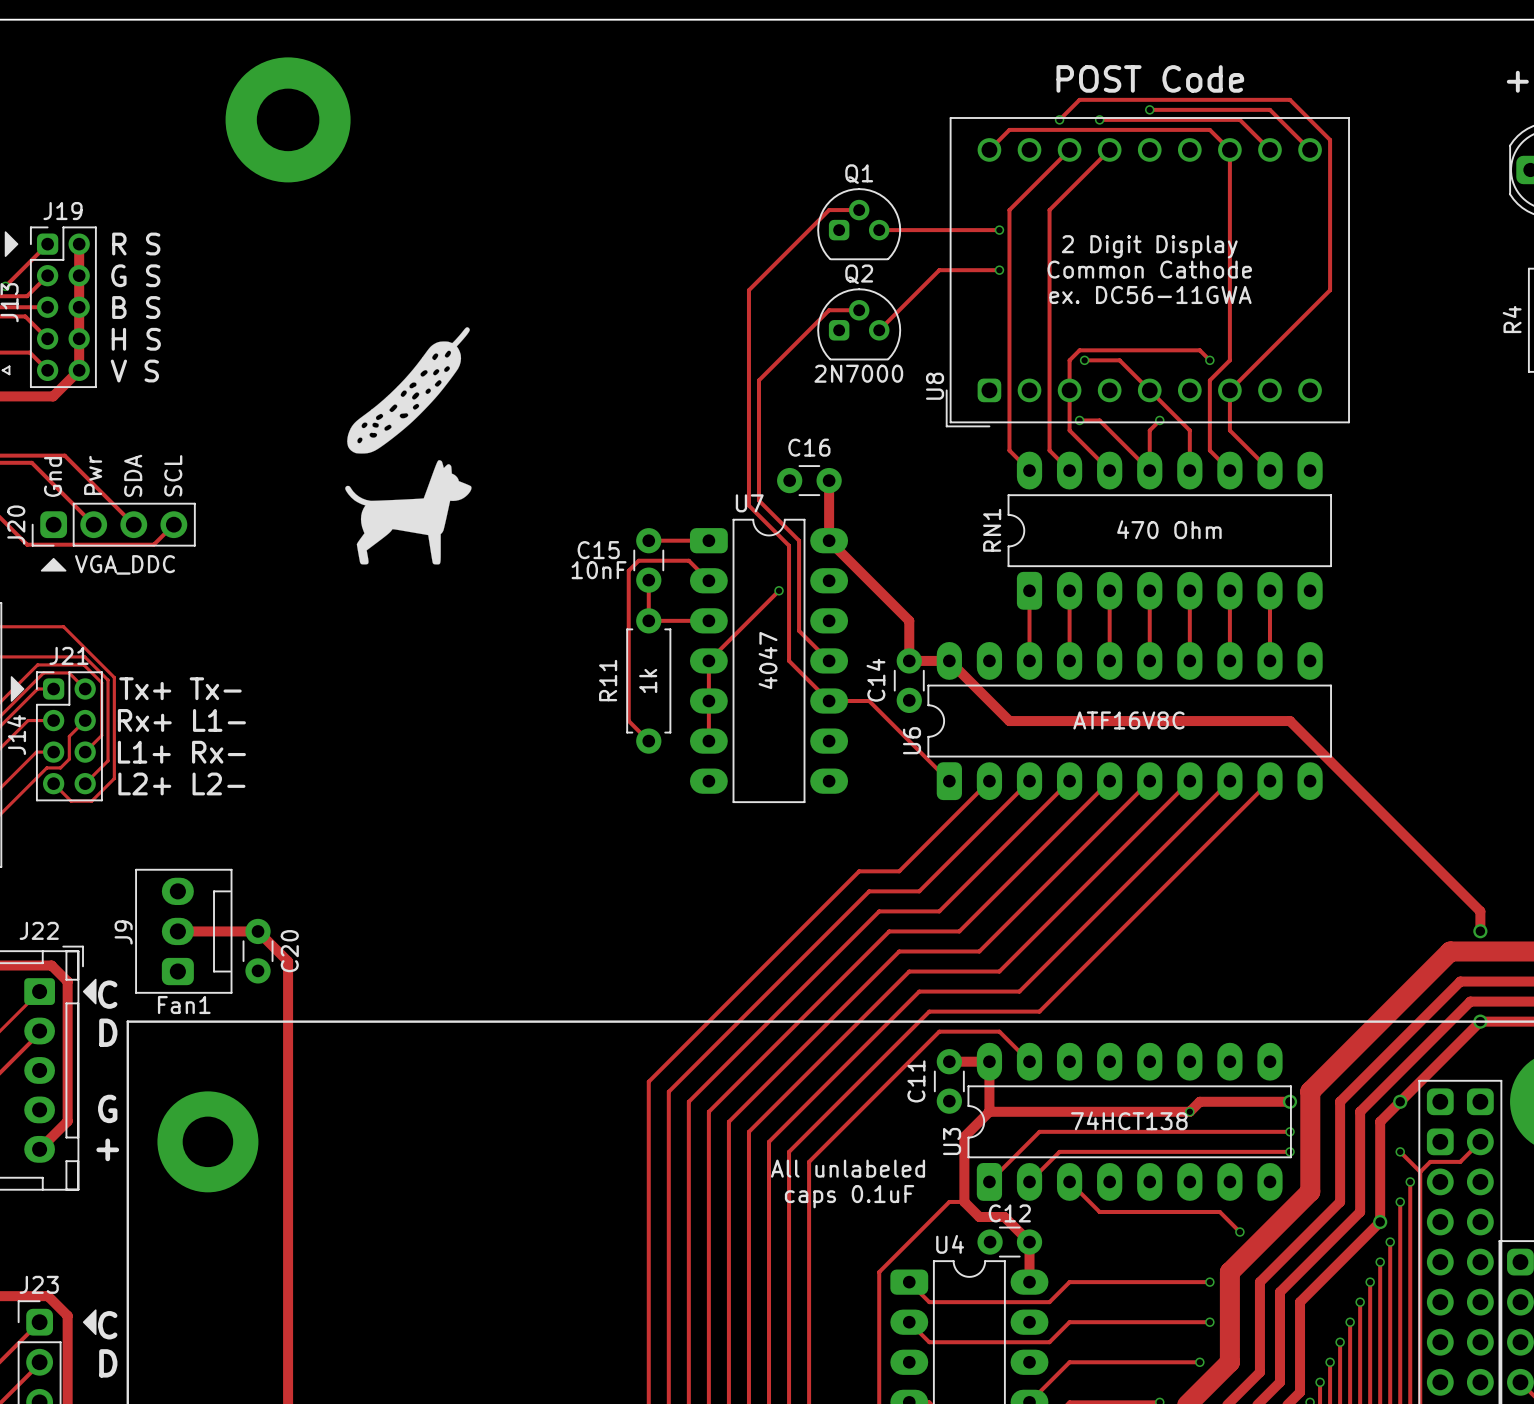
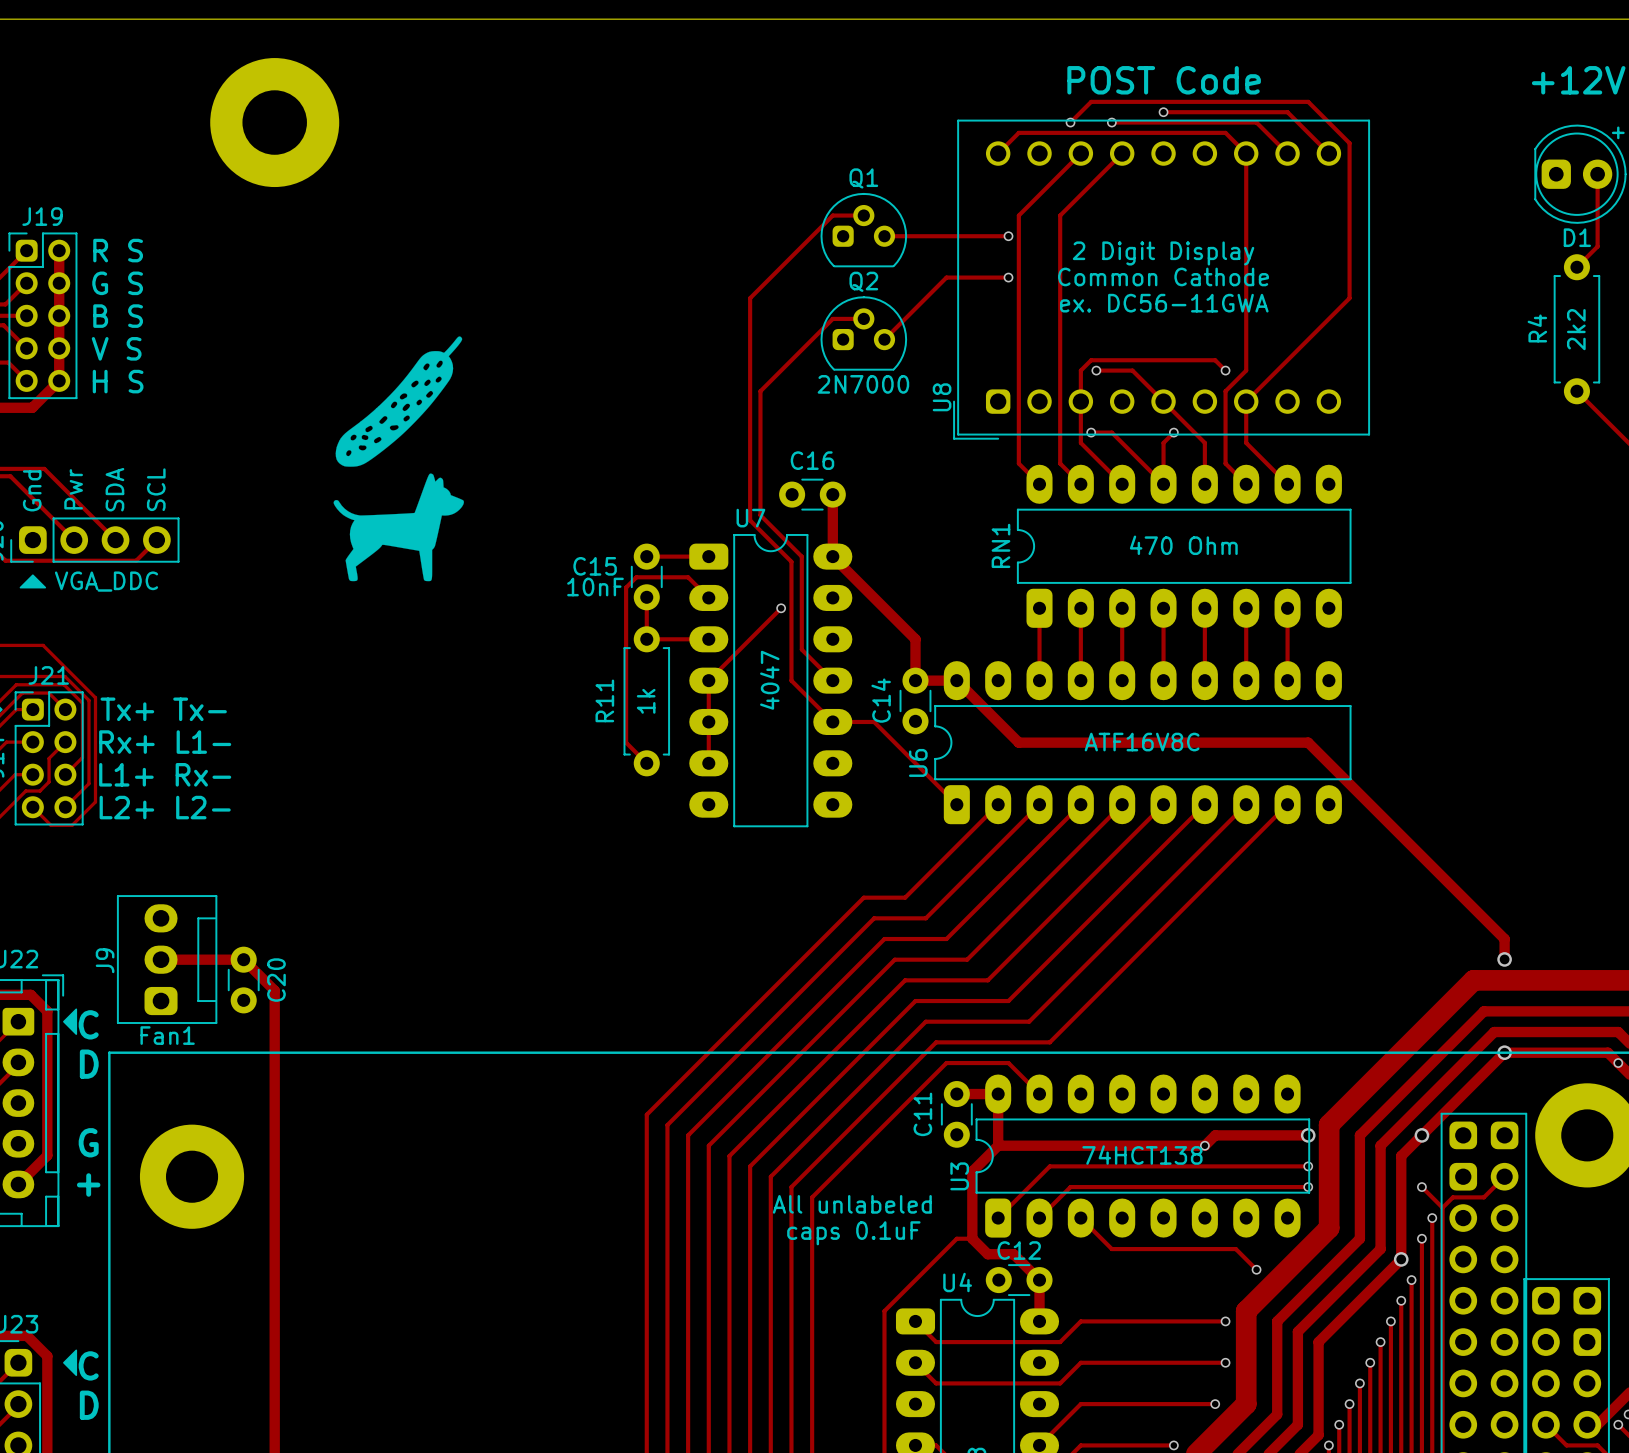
text: H S (136, 339) -> V S (116, 348)
text: V S (134, 371) -> H S (118, 381)

